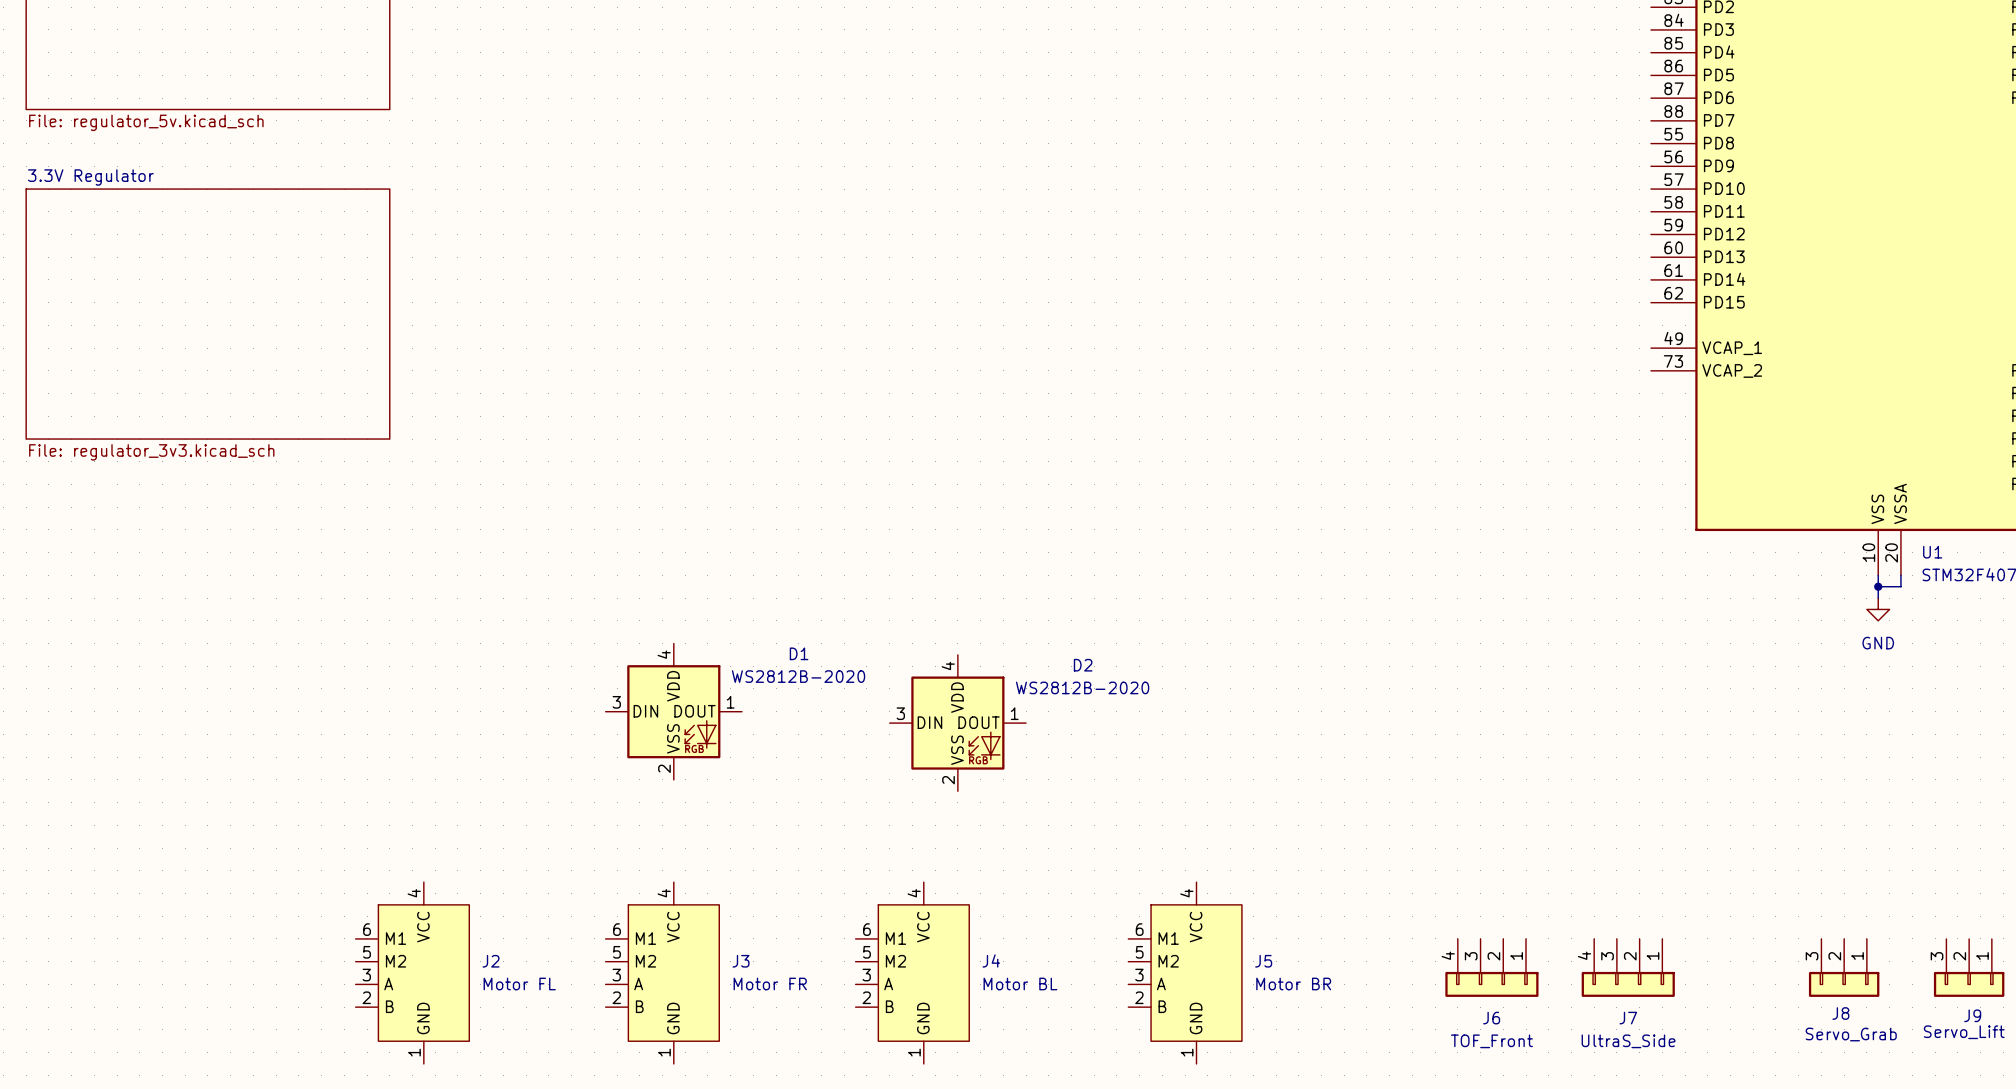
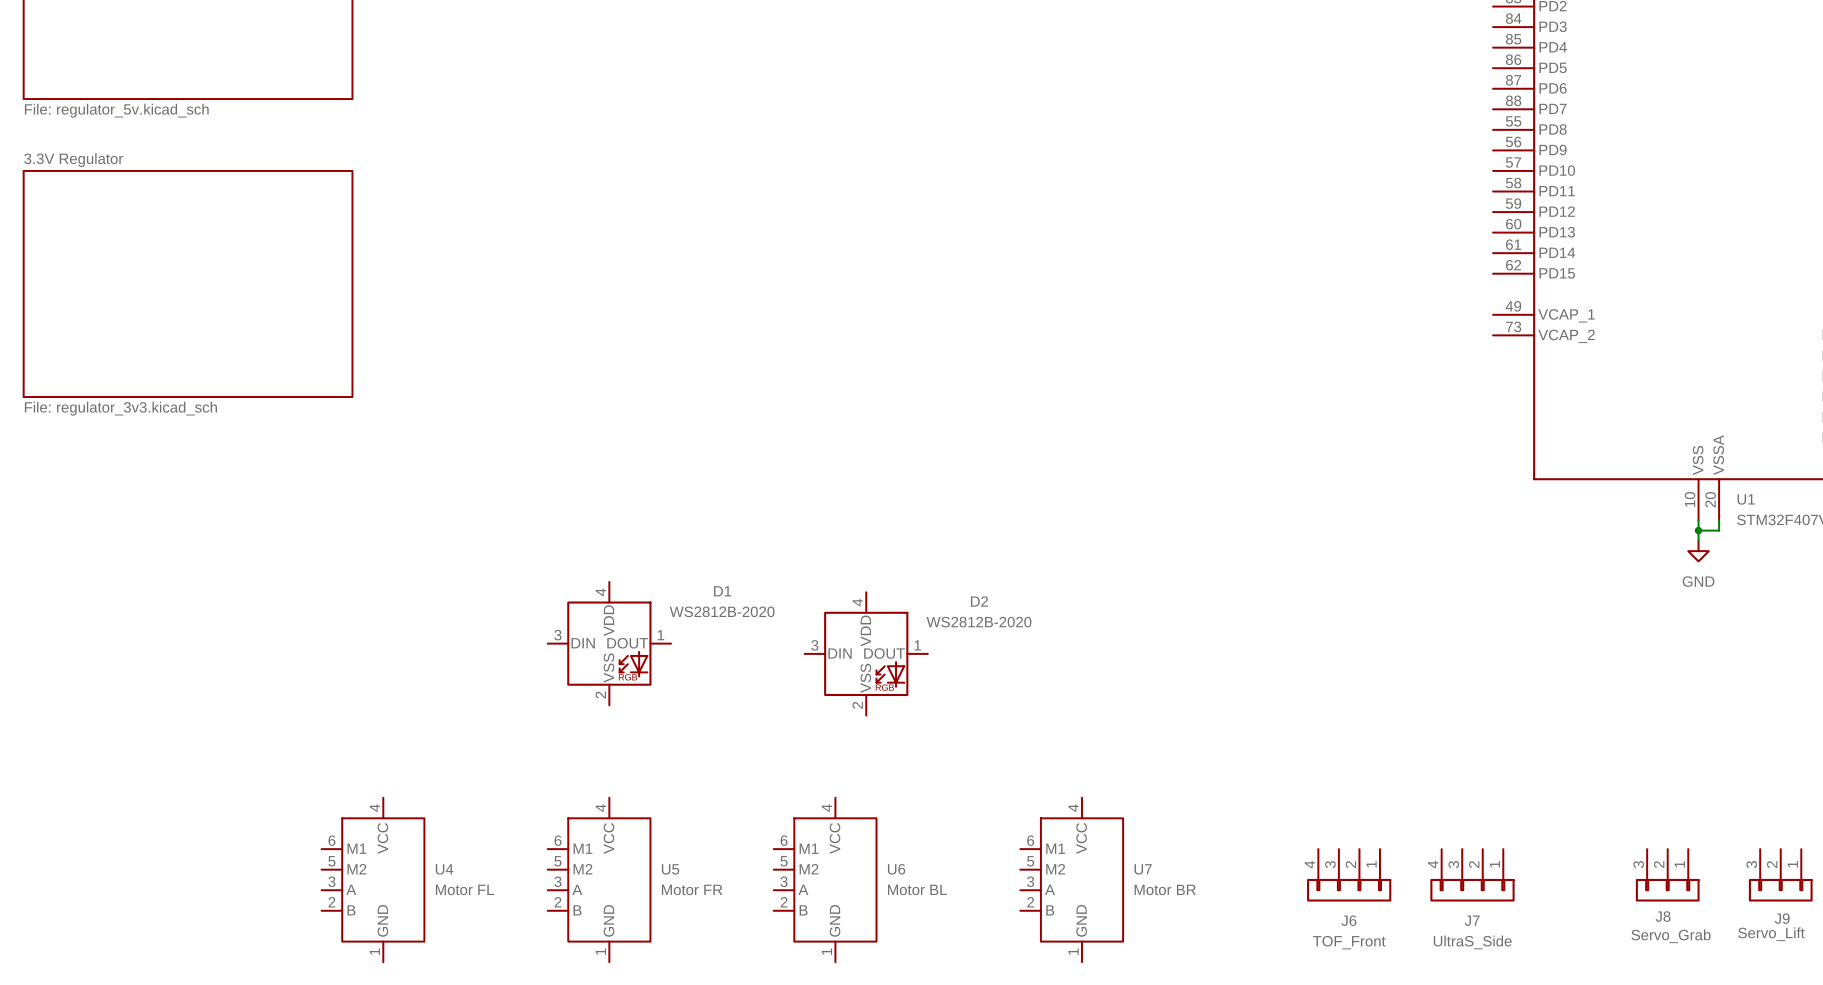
J4 name: J4 (991, 960) -> U6 (896, 869)
J2 name: J2 (491, 961) -> U4 (444, 869)
J3 name: J3 (741, 961) -> U5 (670, 869)
J5 name: J5 (1263, 961) -> U7 (1143, 869)

